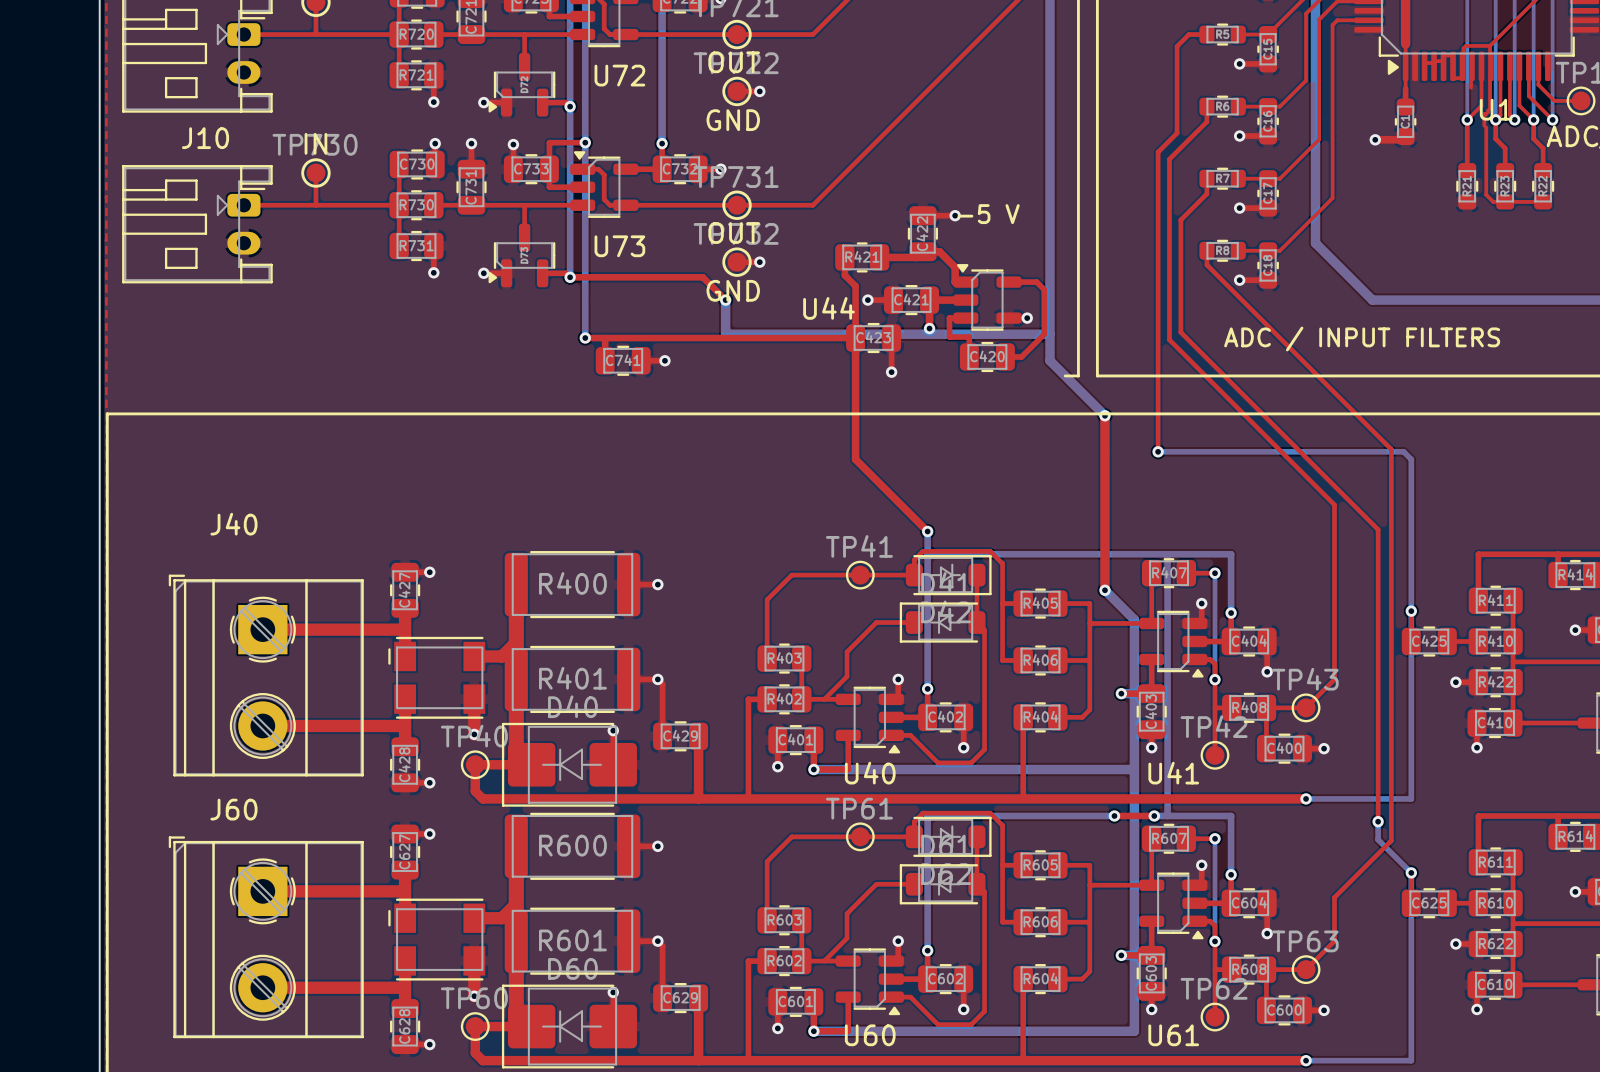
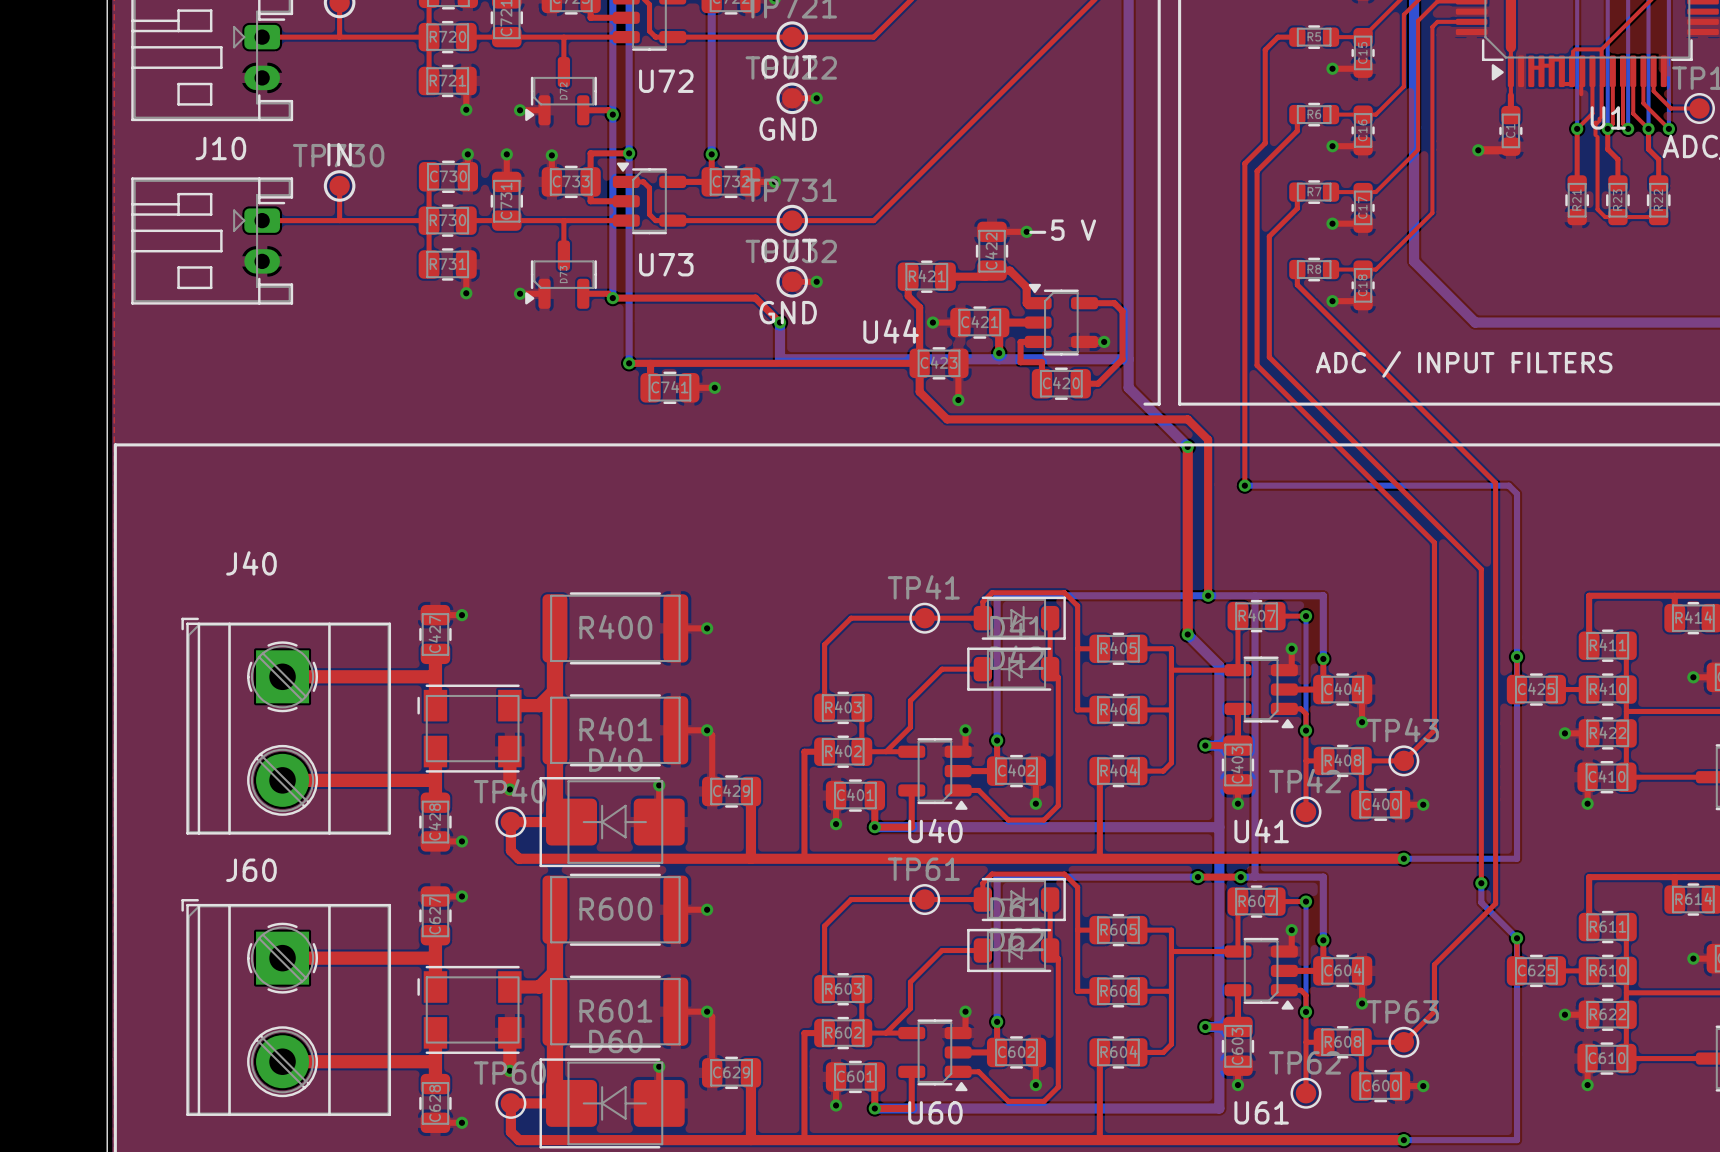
top track: (855, 364) (855, 459) (927, 531) -> (919, 391) (947, 419) (1187, 419) (1208, 439) (1208, 595)
bottom track: (927, 531) (927, 554) -> none
via: (927, 531) -> none
via: none -> (1208, 595)

